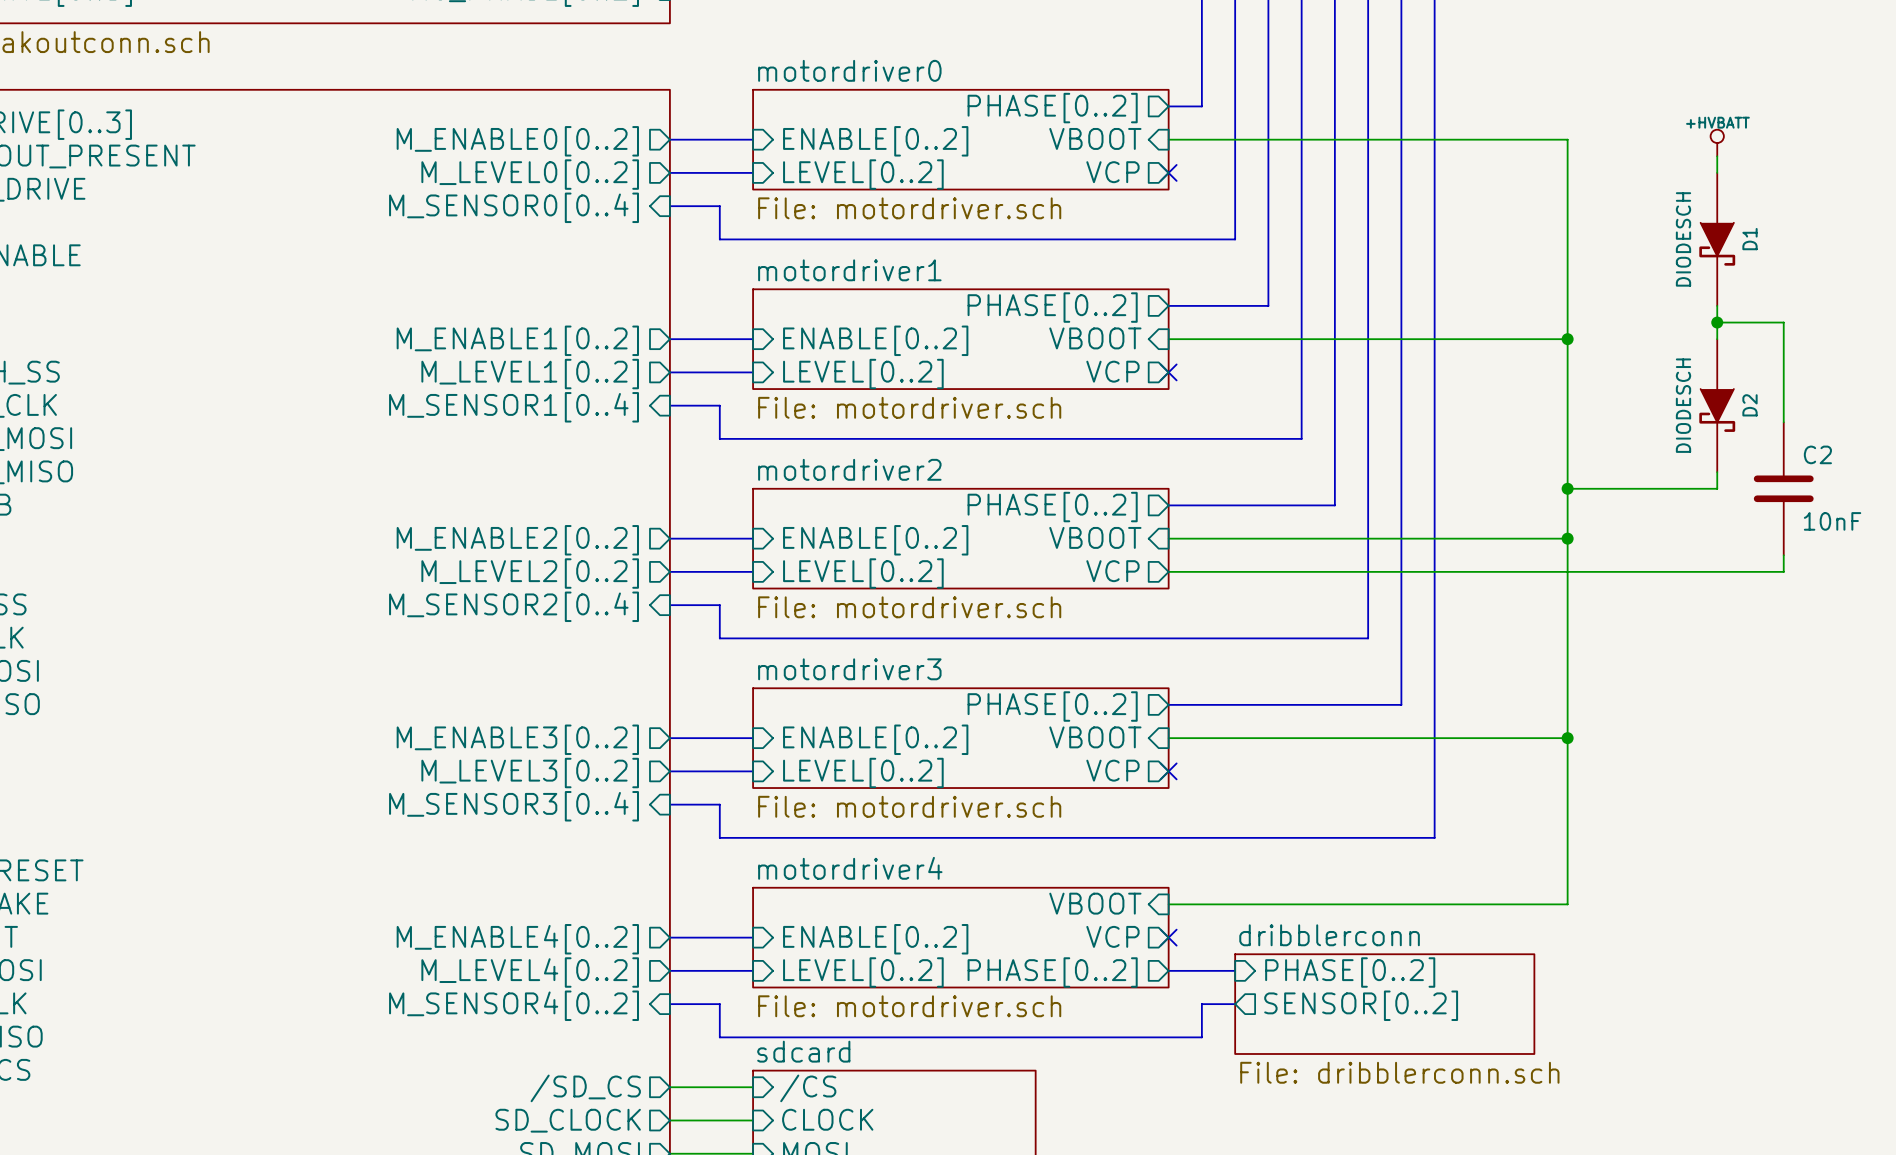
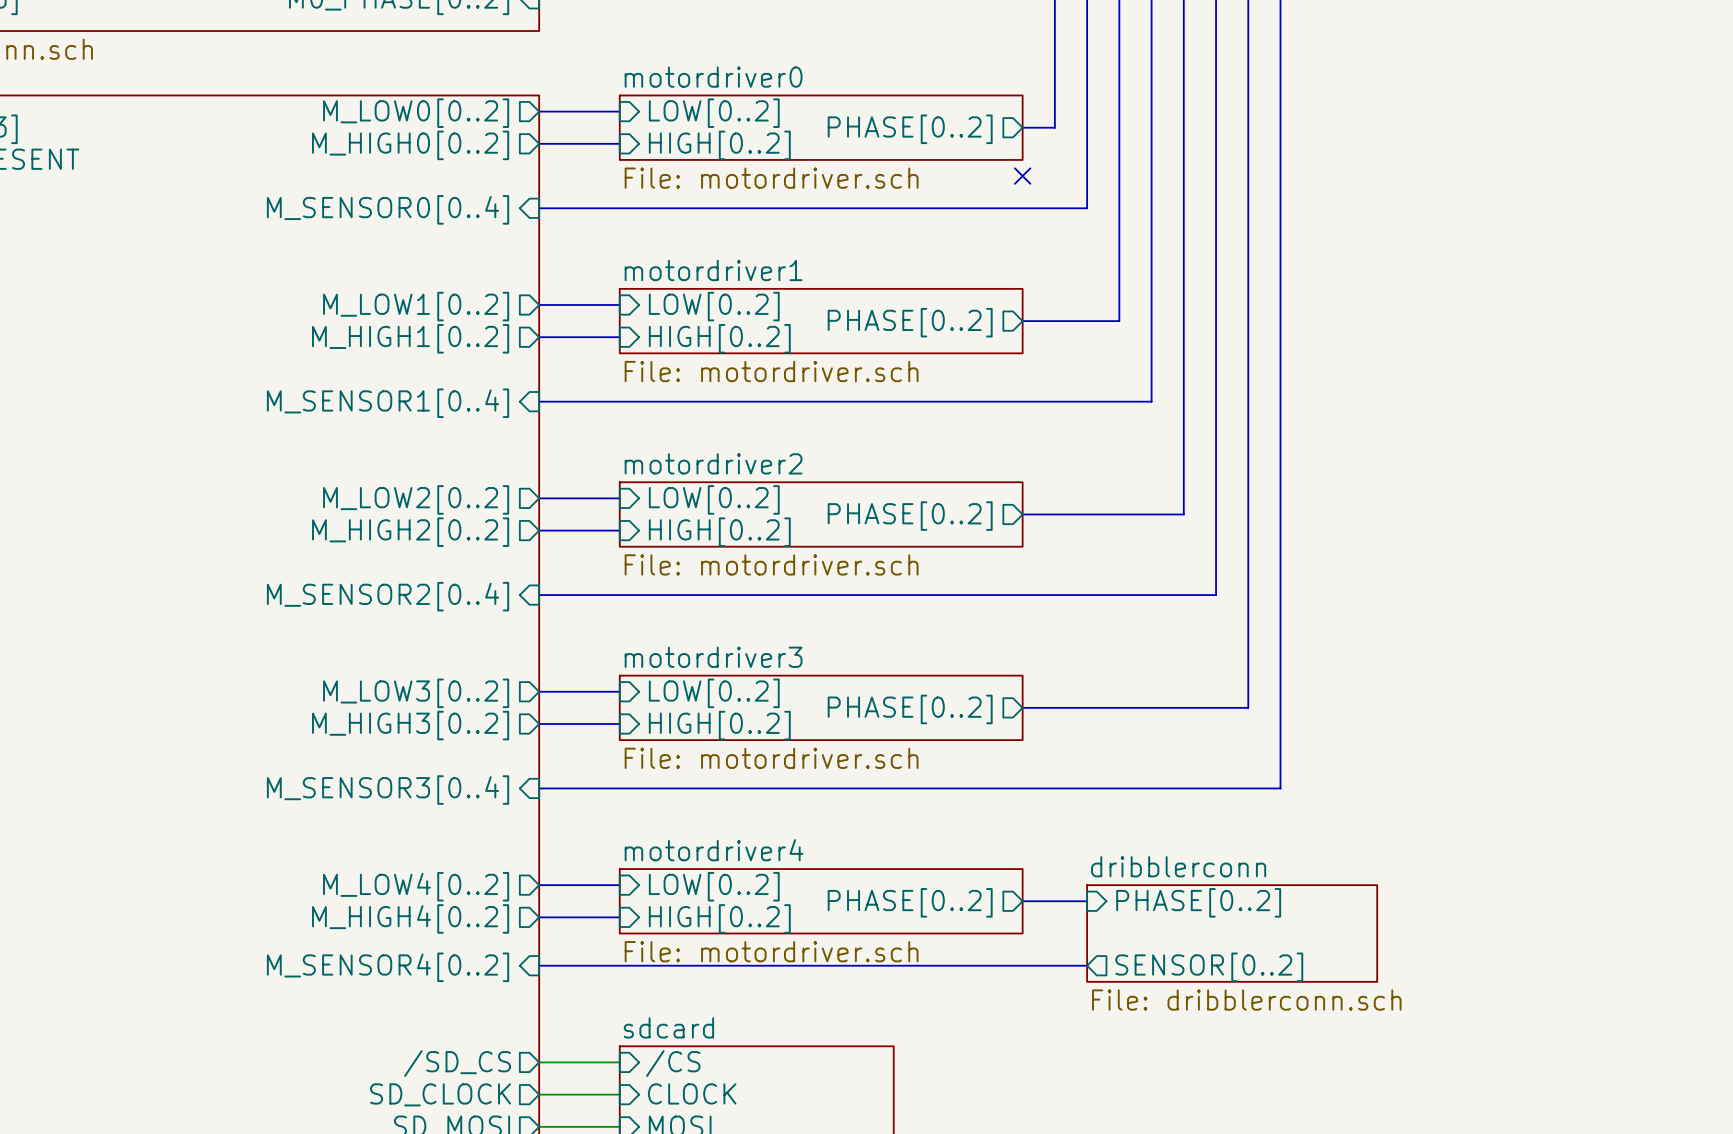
sheet motordriver0 shape: [753, 89, 1169, 190] -> [619, 95, 1023, 160]
bus: (1168, 106) (1201, 106) -> (1022, 127) (1054, 127) (1054, 111)
sheet pin: none -> M_LOW0[0..2] (416, 113)
sheet pin: none -> LOW[0..2] (714, 113)
sheet pin position: PHASE[0..2] (1052, 108) -> PHASE[0..2] (910, 129)
sheet pin: VBOOT (1095, 138) -> none
wire: (1168, 139) (1567, 139) (1567, 904) (1168, 904) -> none
sheet pin: M_ENABLE0[0..2] (517, 141) -> M_HIGH0[0..2] (410, 145)
sheet pin: ENABLE[0..2] (875, 141) -> HIGH[0..2] (719, 145)
power symbol: +HVBATT (1717, 143) -> none
wire: (1717, 156) (1717, 172) -> none
bus: (669, 172) (753, 172) -> (539, 111) (619, 111)
sheet pin: VCP (1112, 172) -> none
sheet pin: M_LEVEL0[0..2] (530, 174) -> none
sheet pin: LEVEL[0..2] (863, 174) -> none
bus: (719, 206) (719, 239) (1235, 239) (1235, 206) -> (587, 208) (1087, 208)
D1: DIODESCH (1717, 239) -> none
sheet motordriver1 shape: [753, 289, 1169, 390] -> [619, 288, 1023, 354]
bus: (1168, 305) (1268, 305) -> (1022, 321) (1119, 321) (1119, 304)
wire: (1717, 305) (1717, 339) -> none
sheet pin: none -> M_LOW1[0..2] (416, 306)
sheet pin: none -> LOW[0..2] (714, 306)
sheet pin position: PHASE[0..2] (1052, 307) -> PHASE[0..2] (910, 322)
wire: (1717, 322) (1783, 322) (1783, 422) -> none
junction: (1717, 322) -> none
sheet pin: VBOOT (1095, 338) -> none
wire: (1168, 339) (1567, 339) -> none
junction: (1567, 339) -> none
sheet pin: M_ENABLE1[0..2] (517, 340) -> M_HIGH1[0..2] (410, 338)
sheet pin: ENABLE[0..2] (875, 340) -> HIGH[0..2] (719, 338)
sheet pin: VCP (1112, 371) -> none
bus: (669, 372) (753, 372) -> (539, 304) (619, 304)
no-connect mark: (1168, 372) -> none
sheet pin: M_LEVEL1[0..2] (530, 374) -> none
sheet pin: LEVEL[0..2] (863, 374) -> none
bus: (719, 405) (719, 438) (1301, 438) (1301, 405) -> (587, 401) (1151, 401)
D2: DIODESCH (1717, 405) -> none
wire: (1717, 472) (1717, 488) (1567, 488) -> none
sheet motordriver2 shape: [753, 488, 1169, 589] -> [619, 482, 1023, 547]
junction: (1567, 488) -> none
C2: 10nF (1783, 488) -> none
bus: (1168, 505) (1334, 505) -> (1022, 514) (1183, 514) (1183, 498)
sheet pin: none -> M_LOW2[0..2] (416, 499)
sheet pin: none -> LOW[0..2] (714, 499)
sheet pin position: PHASE[0..2] (1052, 507) -> PHASE[0..2] (910, 516)
sheet pin: VBOOT (1095, 537) -> none
wire: (1168, 538) (1567, 538) -> none
junction: (1567, 538) -> none
sheet pin: M_ENABLE2[0..2] (517, 540) -> M_HIGH2[0..2] (410, 532)
sheet pin: ENABLE[0..2] (875, 540) -> HIGH[0..2] (719, 532)
wire: (1783, 555) (1783, 571) (1168, 571) -> none
bus: (669, 571) (753, 571) -> (539, 498) (619, 498)
sheet pin: VCP (1112, 571) -> none
sheet pin: M_LEVEL2[0..2] (530, 573) -> none
sheet pin: LEVEL[0..2] (863, 573) -> none
bus: (719, 605) (719, 638) (1368, 638) (1368, 605) -> (587, 595) (1216, 595)
sheet motordriver3 shape: [753, 688, 1169, 789] -> [619, 675, 1023, 741]
bus: (1168, 704) (1401, 704) -> (1022, 707) (1248, 707) (1248, 691)
sheet pin: none -> M_LOW3[0..2] (416, 693)
sheet pin: none -> LOW[0..2] (714, 693)
sheet pin position: PHASE[0..2] (1052, 706) -> PHASE[0..2] (910, 709)
sheet pin: VBOOT (1095, 737) -> none
wire: (1168, 738) (1567, 738) -> none
junction: (1567, 738) -> none
sheet pin: M_ENABLE3[0..2] (517, 739) -> M_HIGH3[0..2] (410, 725)
sheet pin: ENABLE[0..2] (875, 739) -> HIGH[0..2] (719, 725)
sheet pin: VCP (1112, 770) -> none
bus: (669, 771) (753, 771) -> (539, 691) (619, 691)
no-connect mark: (1168, 771) -> none
sheet pin: M_LEVEL3[0..2] (530, 773) -> none
sheet pin: LEVEL[0..2] (863, 773) -> none
bus: (719, 804) (719, 837) (1434, 837) (1434, 804) -> (587, 788) (1280, 788)
sheet motordriver4 shape: [753, 887, 1169, 988] -> [619, 869, 1023, 934]
sheet pin: VBOOT (1095, 903) -> none
sheet pin: none -> M_LOW4[0..2] (416, 886)
sheet pin: none -> LOW[0..2] (714, 886)
sheet pin: VCP (1112, 936) -> none
no-connect mark: (1168, 937) -> none
sheet pin: M_ENABLE4[0..2] (517, 939) -> M_HIGH4[0..2] (410, 918)
sheet pin: ENABLE[0..2] (875, 939) -> HIGH[0..2] (719, 918)
bus: (669, 970) (753, 970) -> (539, 885) (619, 885)
bus: (1168, 970) (1235, 970) -> (1022, 901) (1087, 901)
sheet pin: M_LEVEL4[0..2] (530, 972) -> none
sheet pin: LEVEL[0..2] (863, 972) -> none
sheet pin position: PHASE[0..2] (1052, 972) -> PHASE[0..2] (910, 902)
sheet pin position: PHASE[0..2] (1350, 972) -> PHASE[0..2] (1198, 902)
bus: none -> (539, 965) (1087, 965)
bus: (669, 1004) (719, 1004) (719, 1037) (1201, 1037) (1201, 1004) (1235, 1004) -> none
sheet dribblerconn position: (1384, 1004) -> (1232, 933)
sheet pin position: M_SENSOR4[0..2] (514, 1005) -> M_SENSOR4[0..2] (388, 967)
sheet pin position: SENSOR[0..2] (1361, 1005) -> SENSOR[0..2] (1209, 967)

